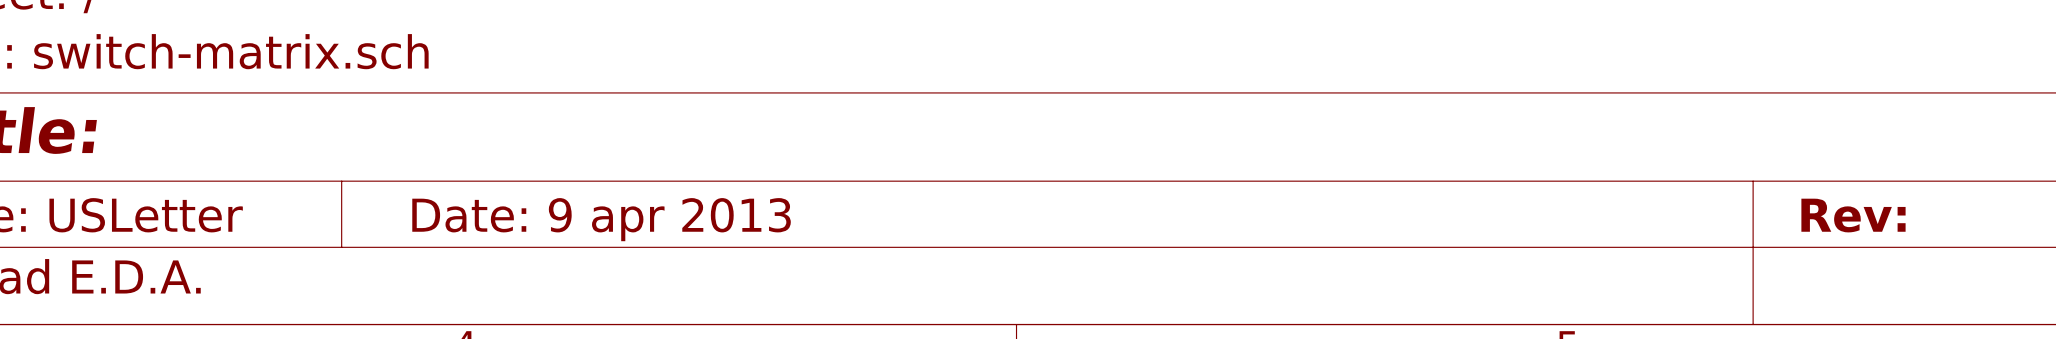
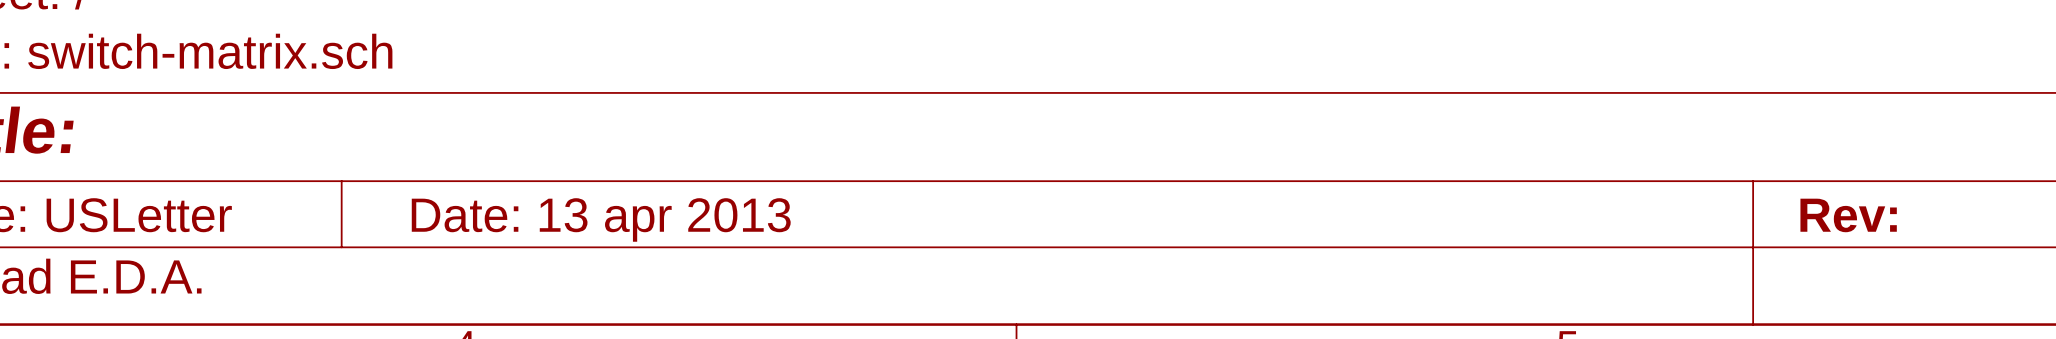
title block: Date: 9 apr 2013 (601, 219) -> Date: 13 apr 2013 (601, 219)

